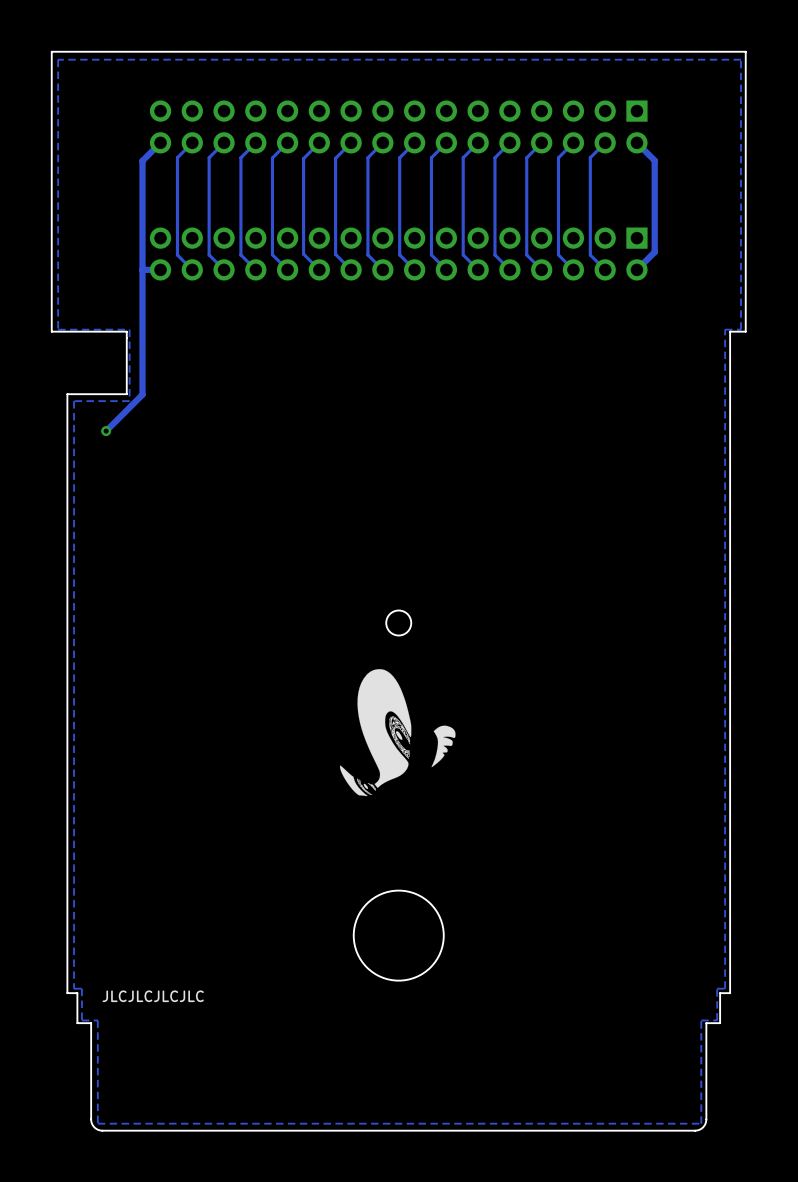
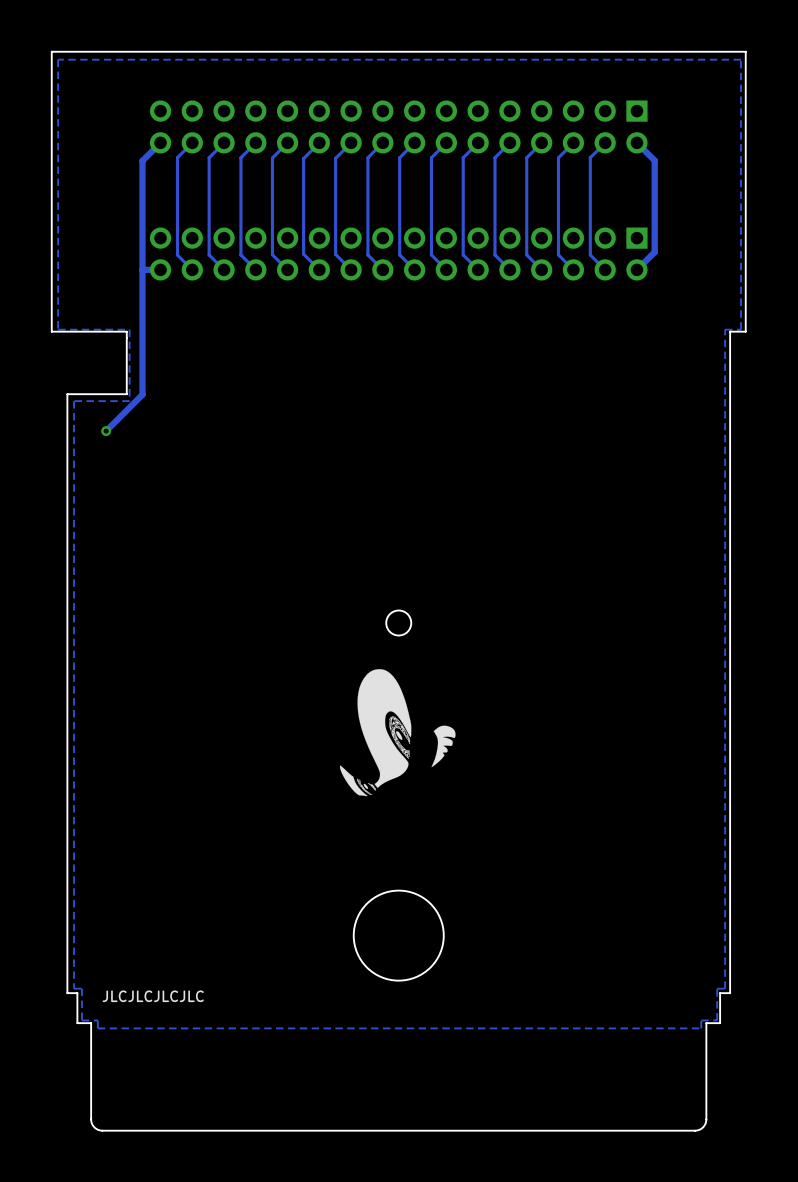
zone outline: (701, 1028) (701, 1123) (97, 1123) (97, 1028) -> (701, 1028) (97, 1028)

